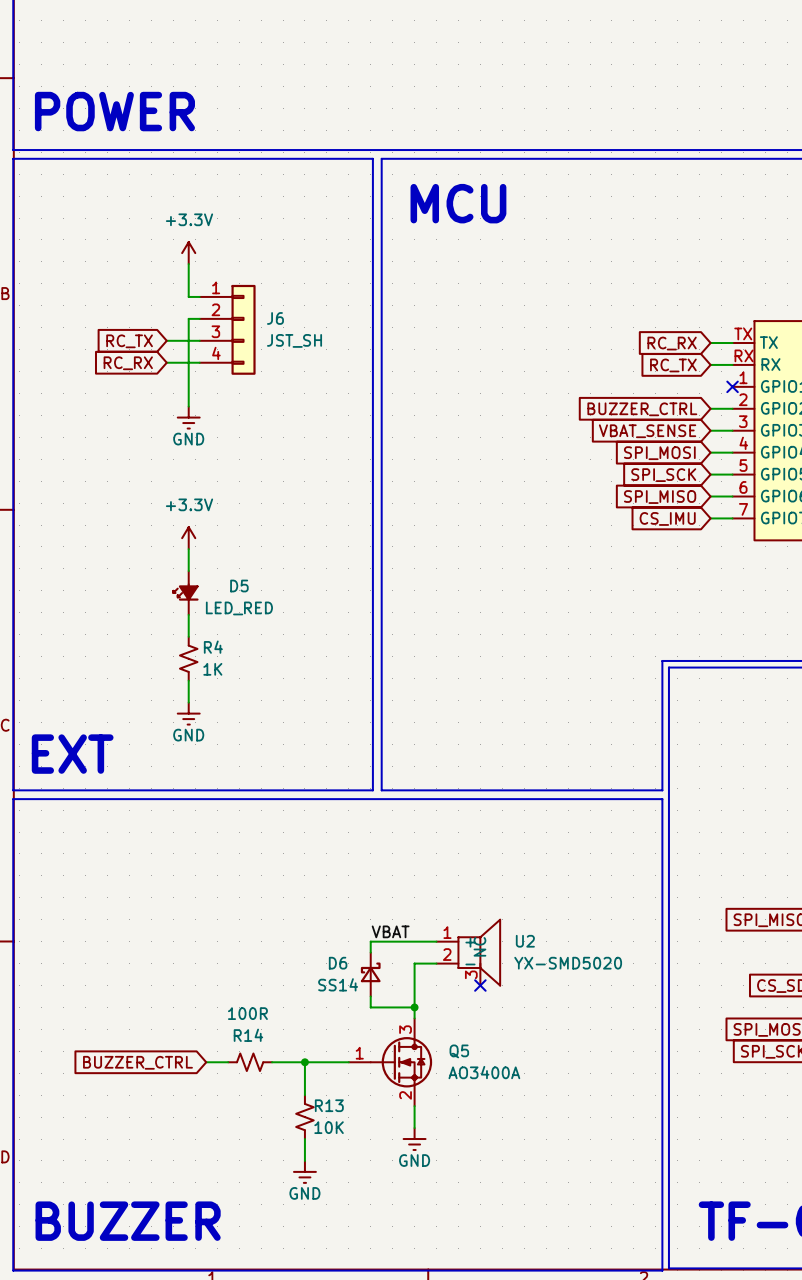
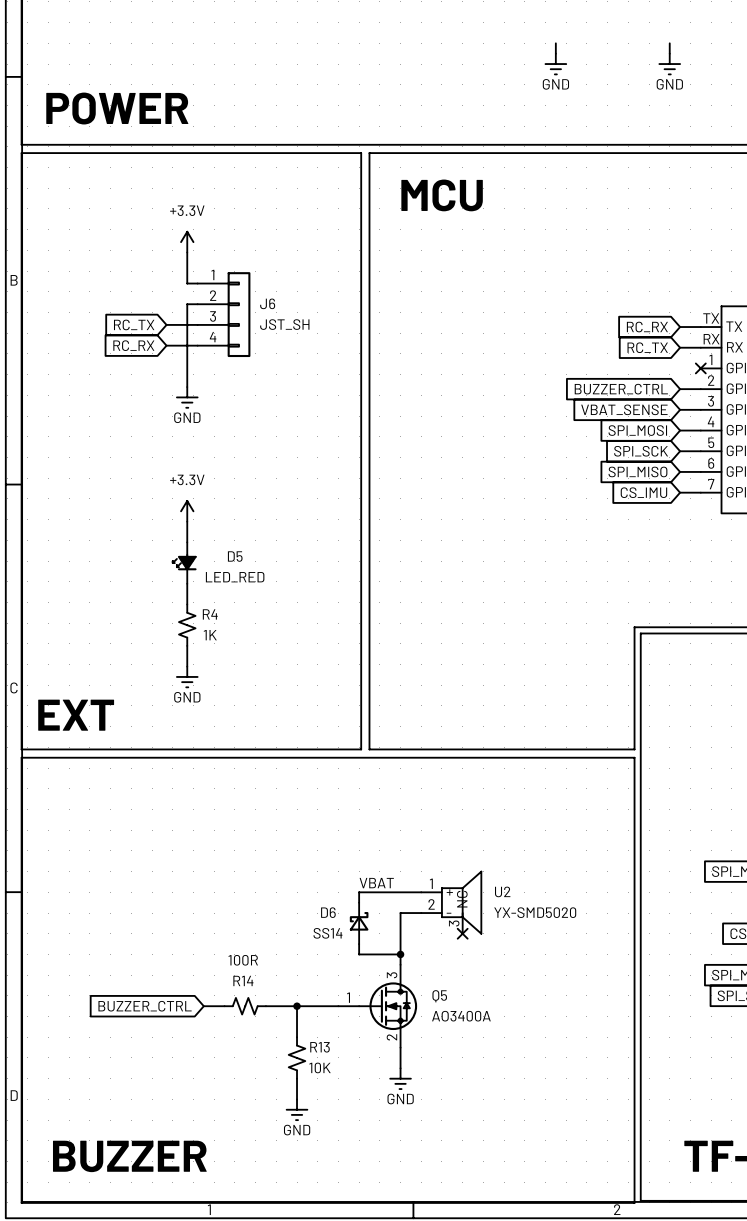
wire: none -> (555, 43) (555, 53)
wire: none -> (669, 43) (669, 53)
power symbol: none -> GND (555, 64)
power symbol: none -> GND (669, 64)

